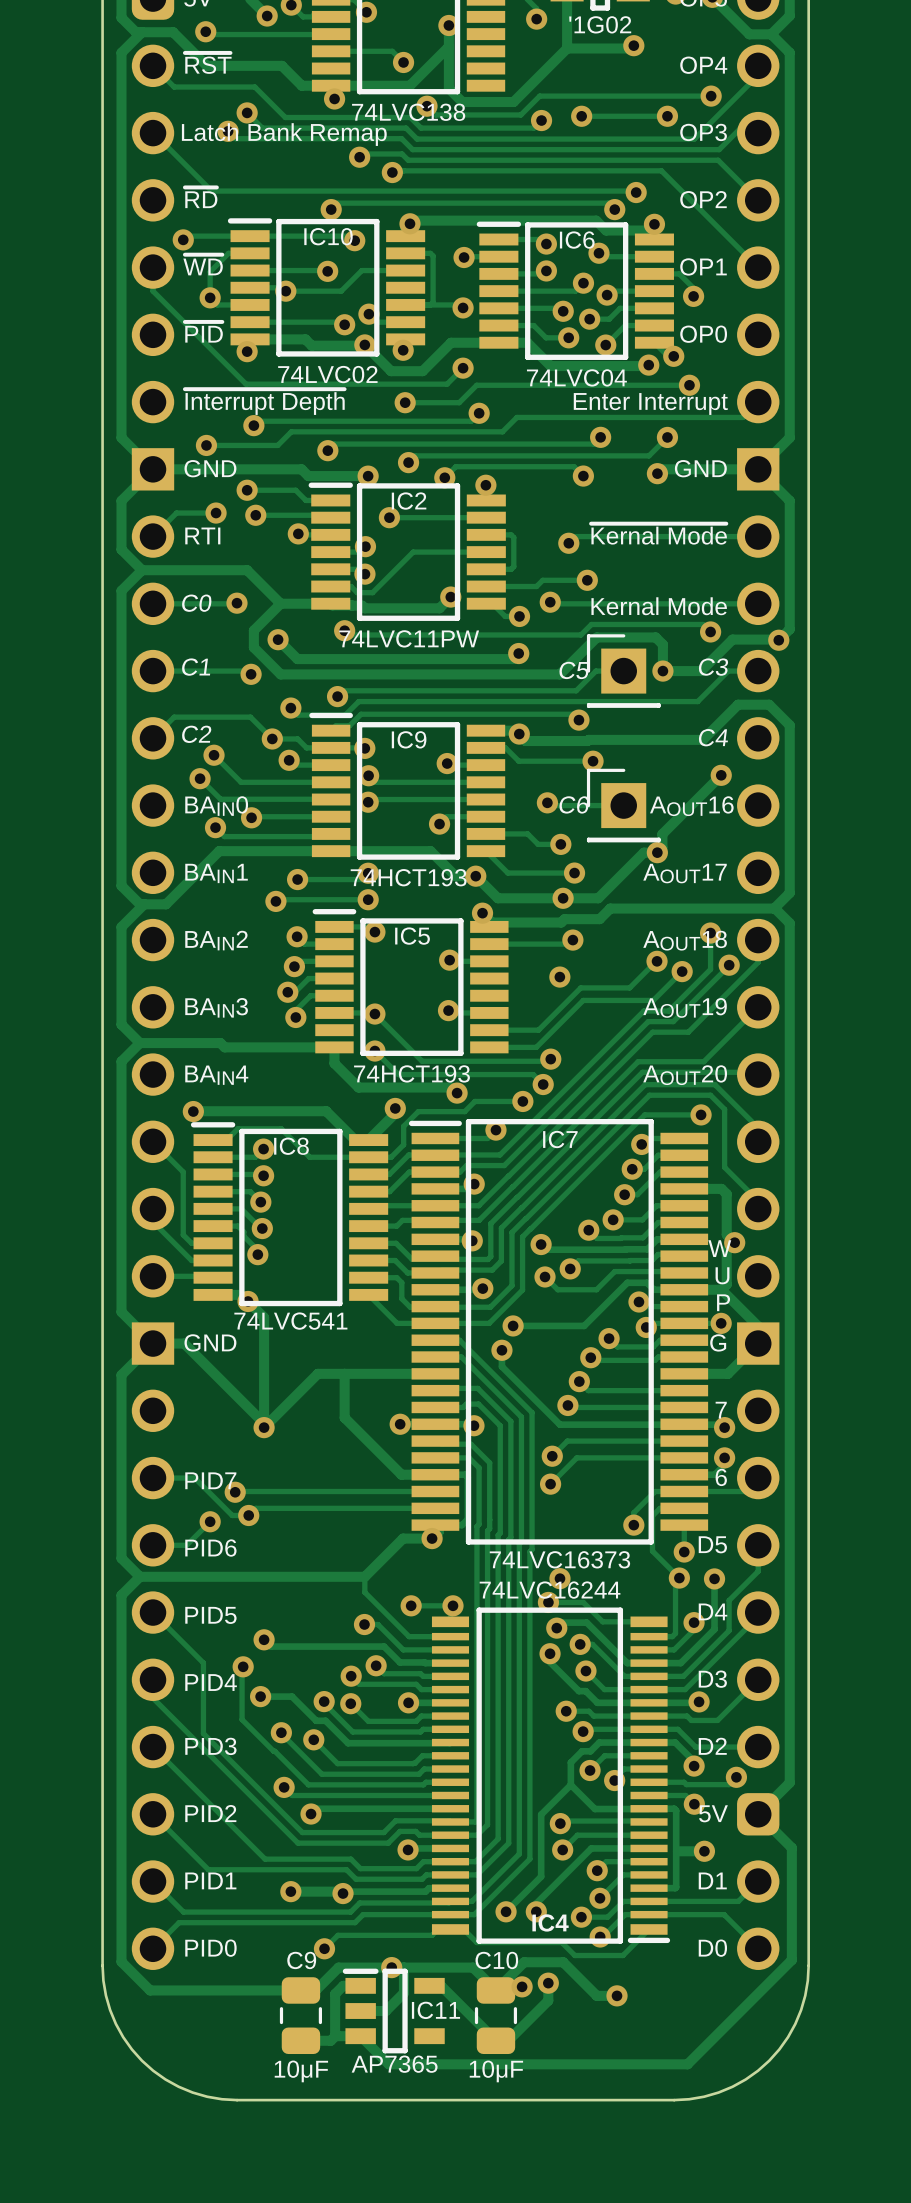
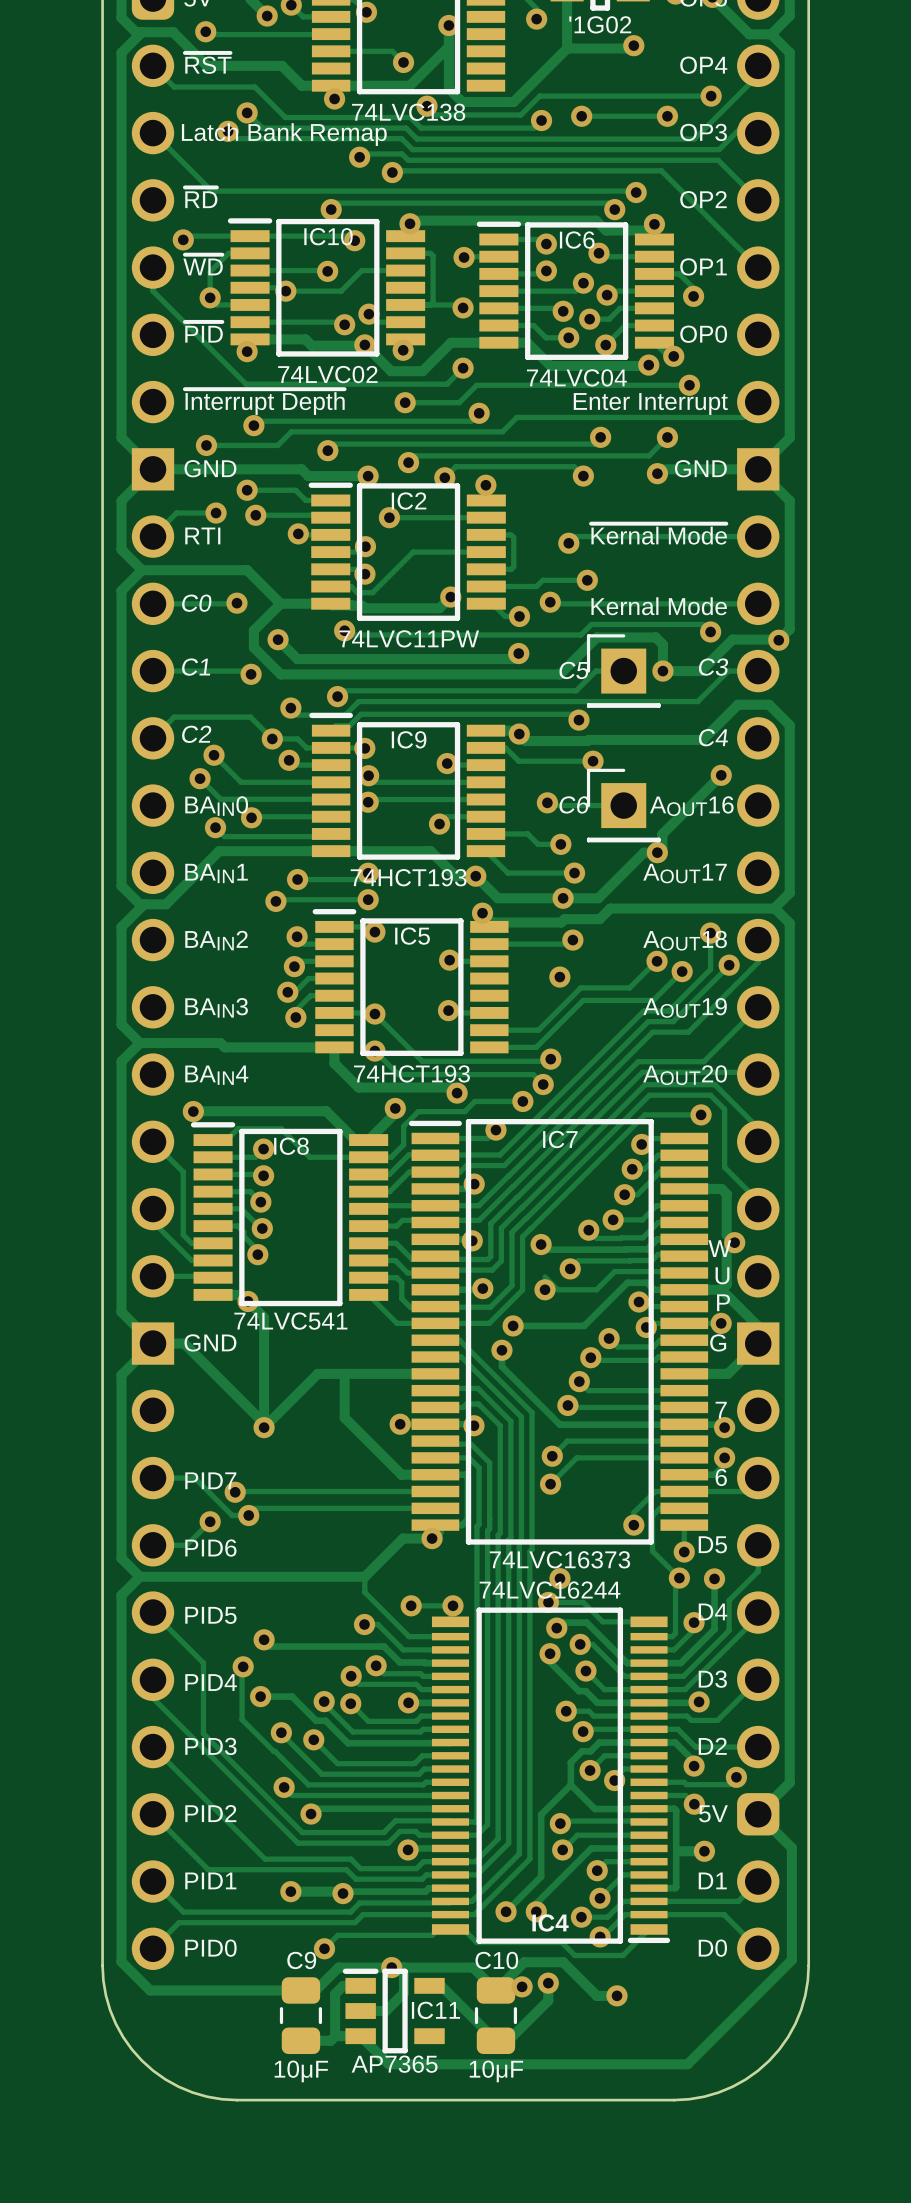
via position: (545, 1276) -> (545, 1289)

